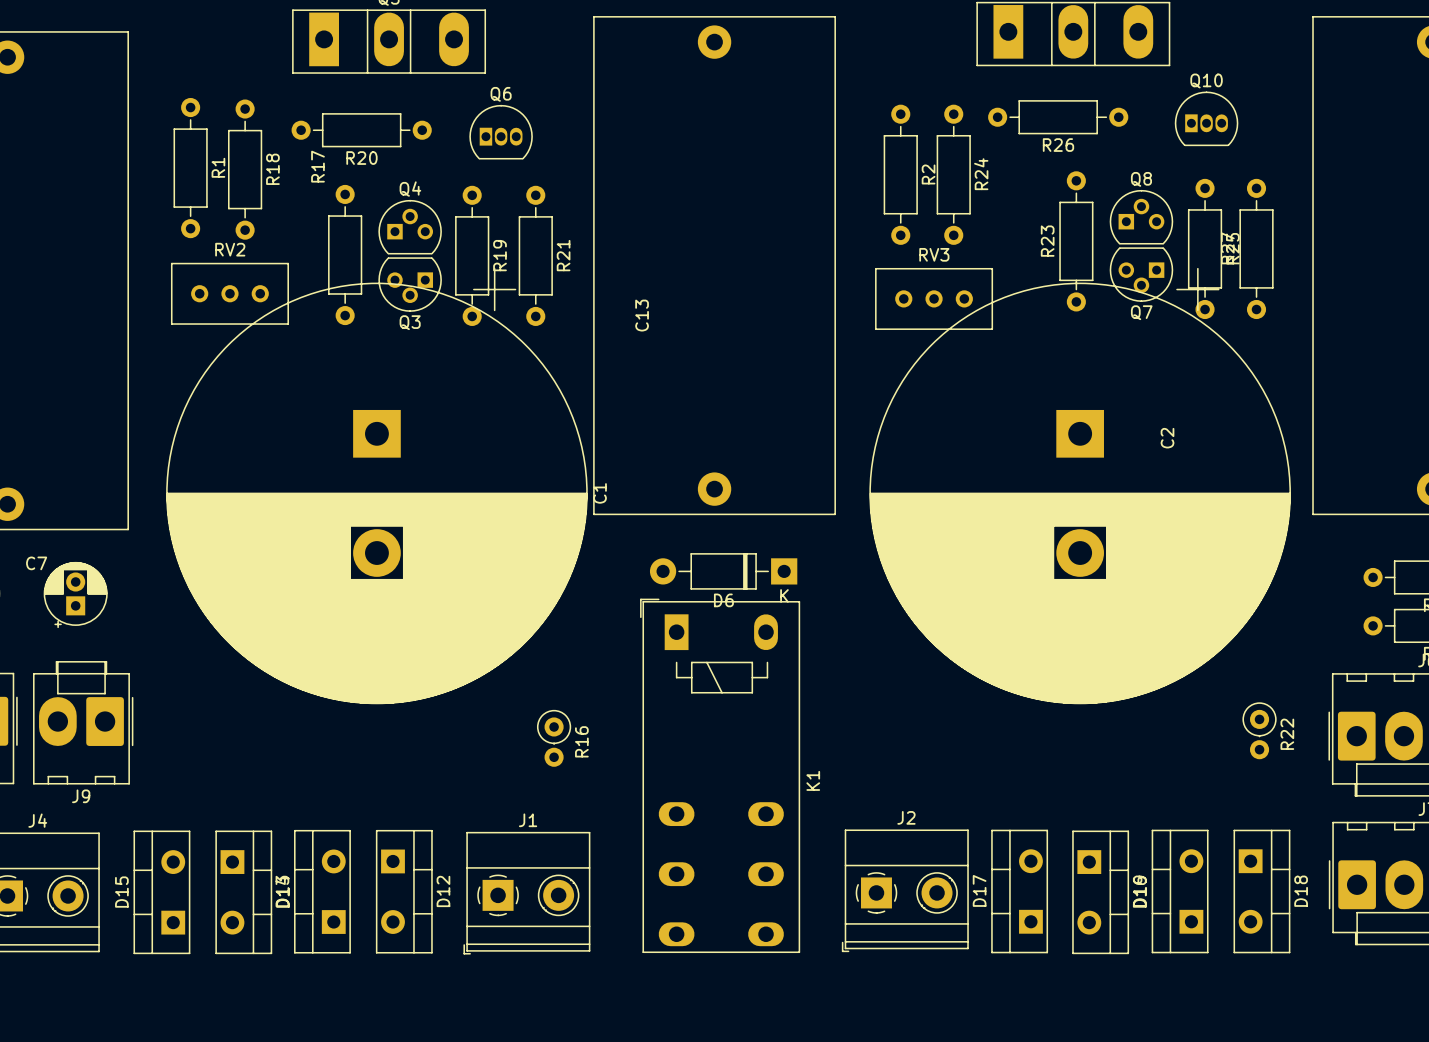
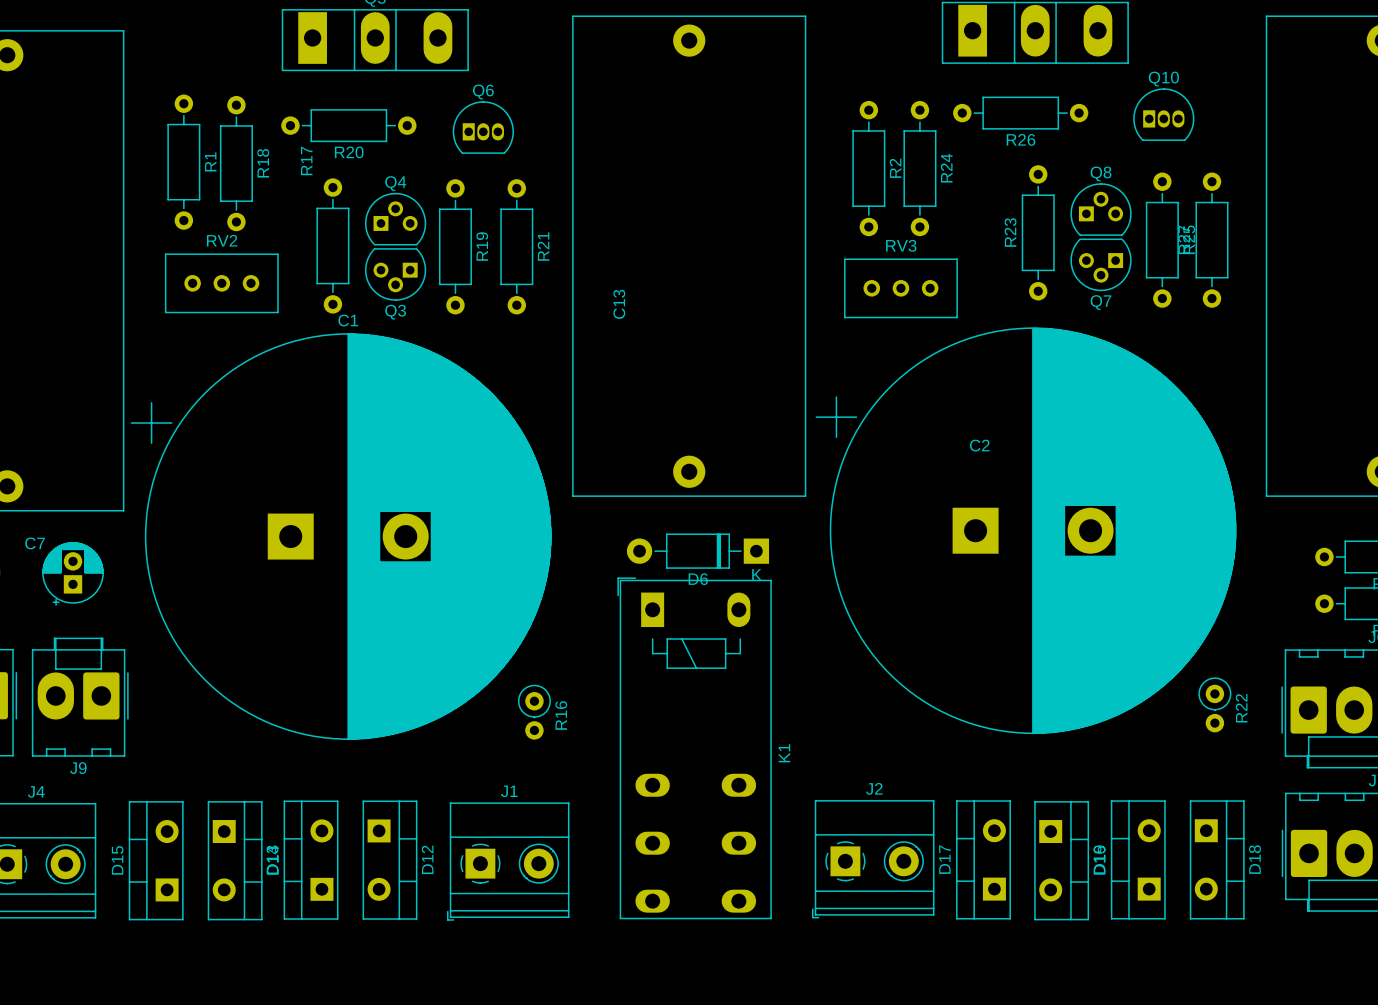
C1 rotation: 0° (376, 486) -> 90° counterclockwise (341, 536)
C2 rotation: 0° (1080, 486) -> 90° counterclockwise (1026, 530)

